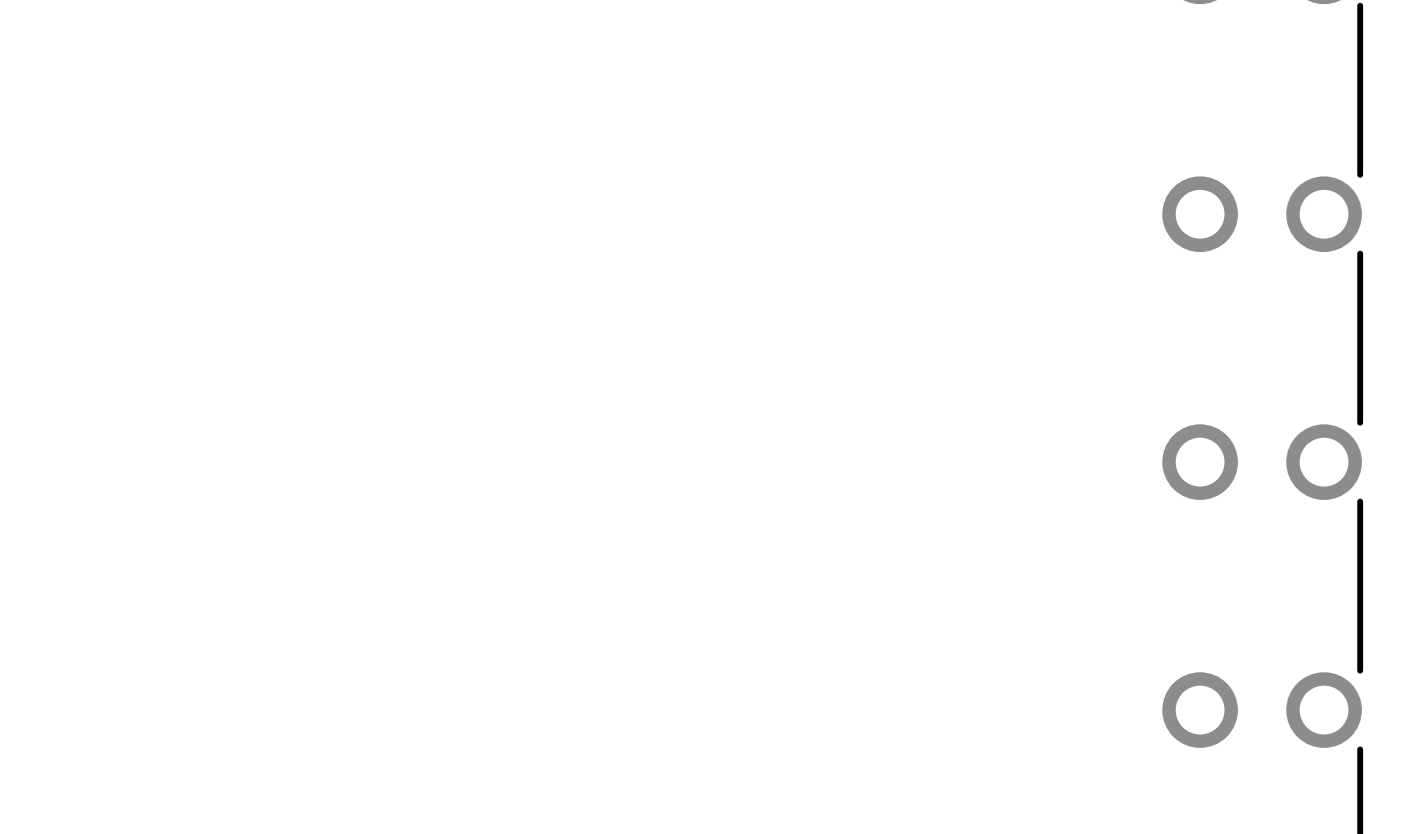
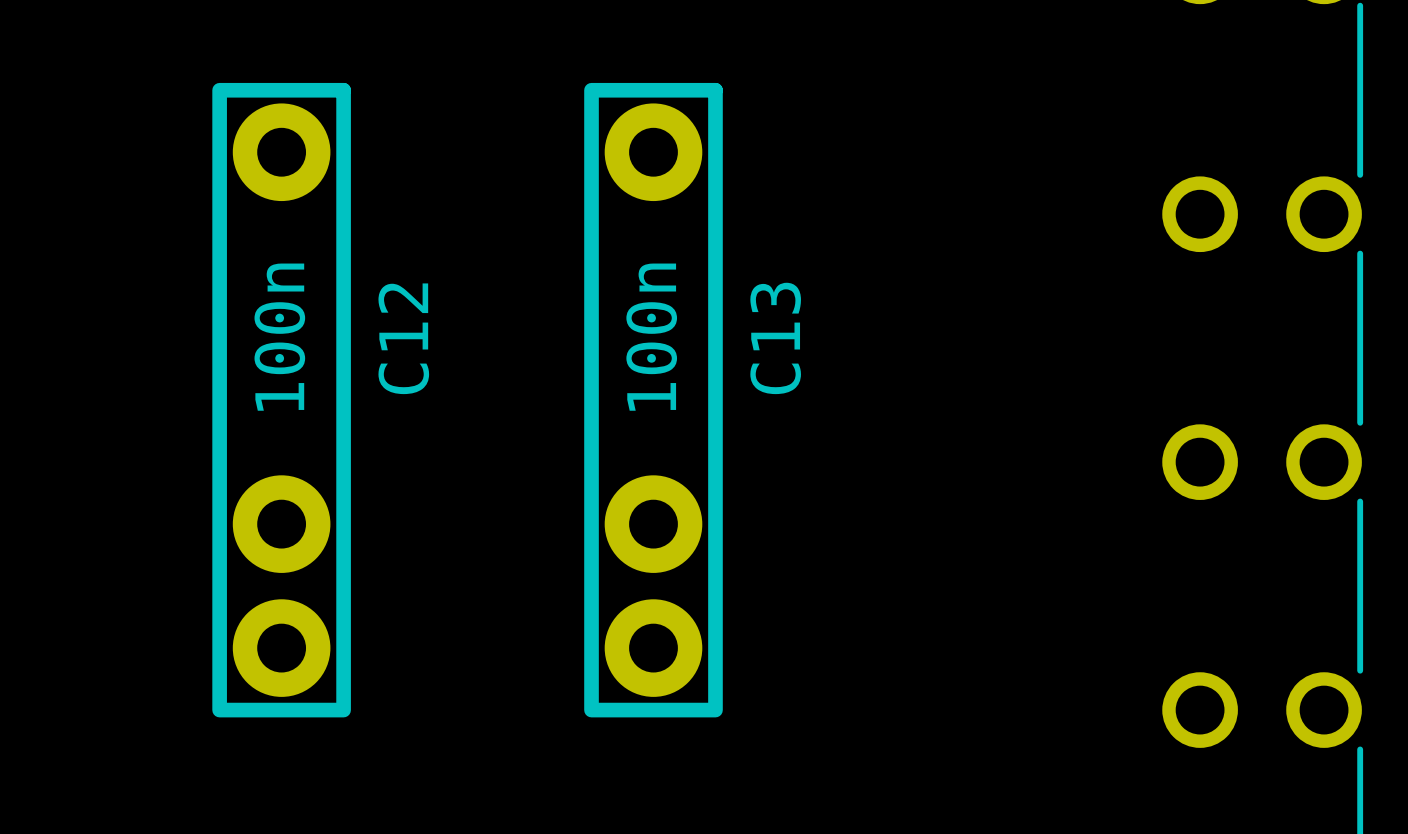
C12: none -> 100n (281, 400)
C13: none -> 100n (653, 400)

